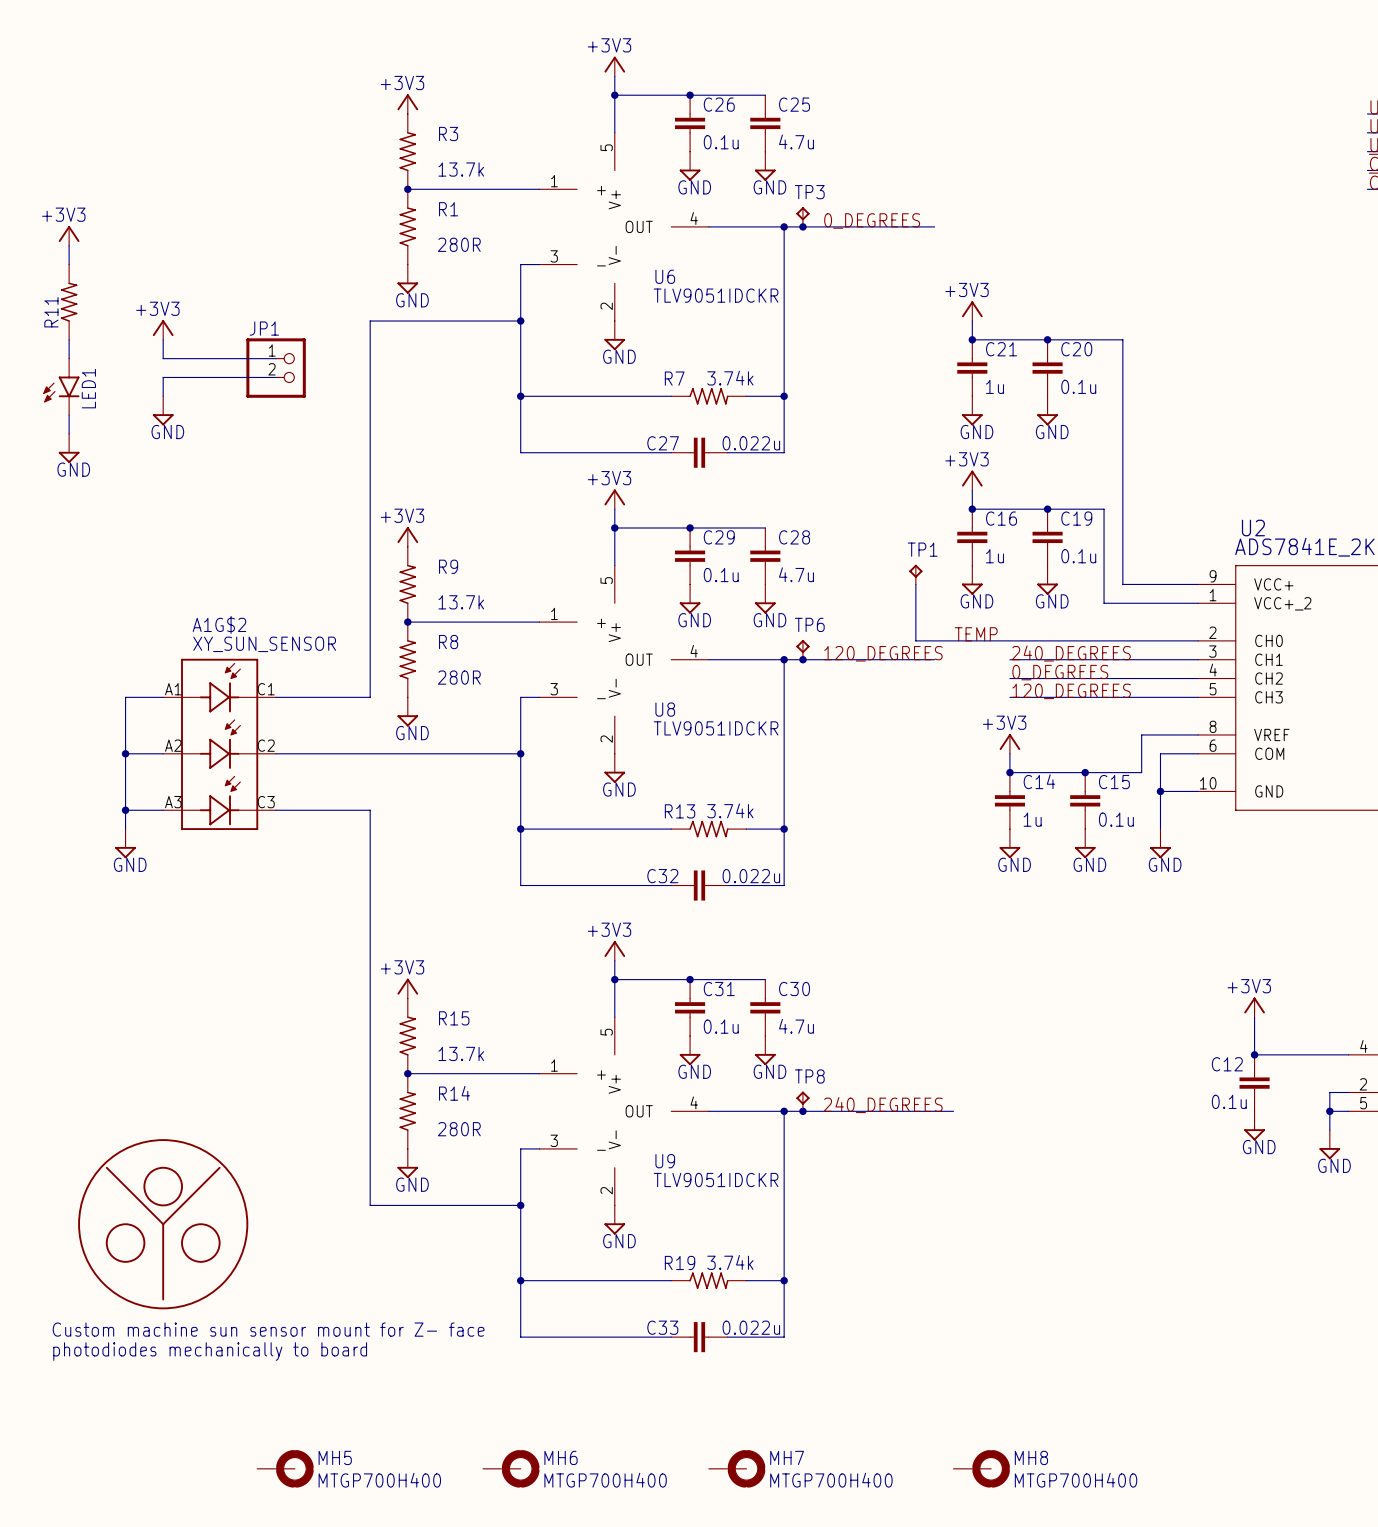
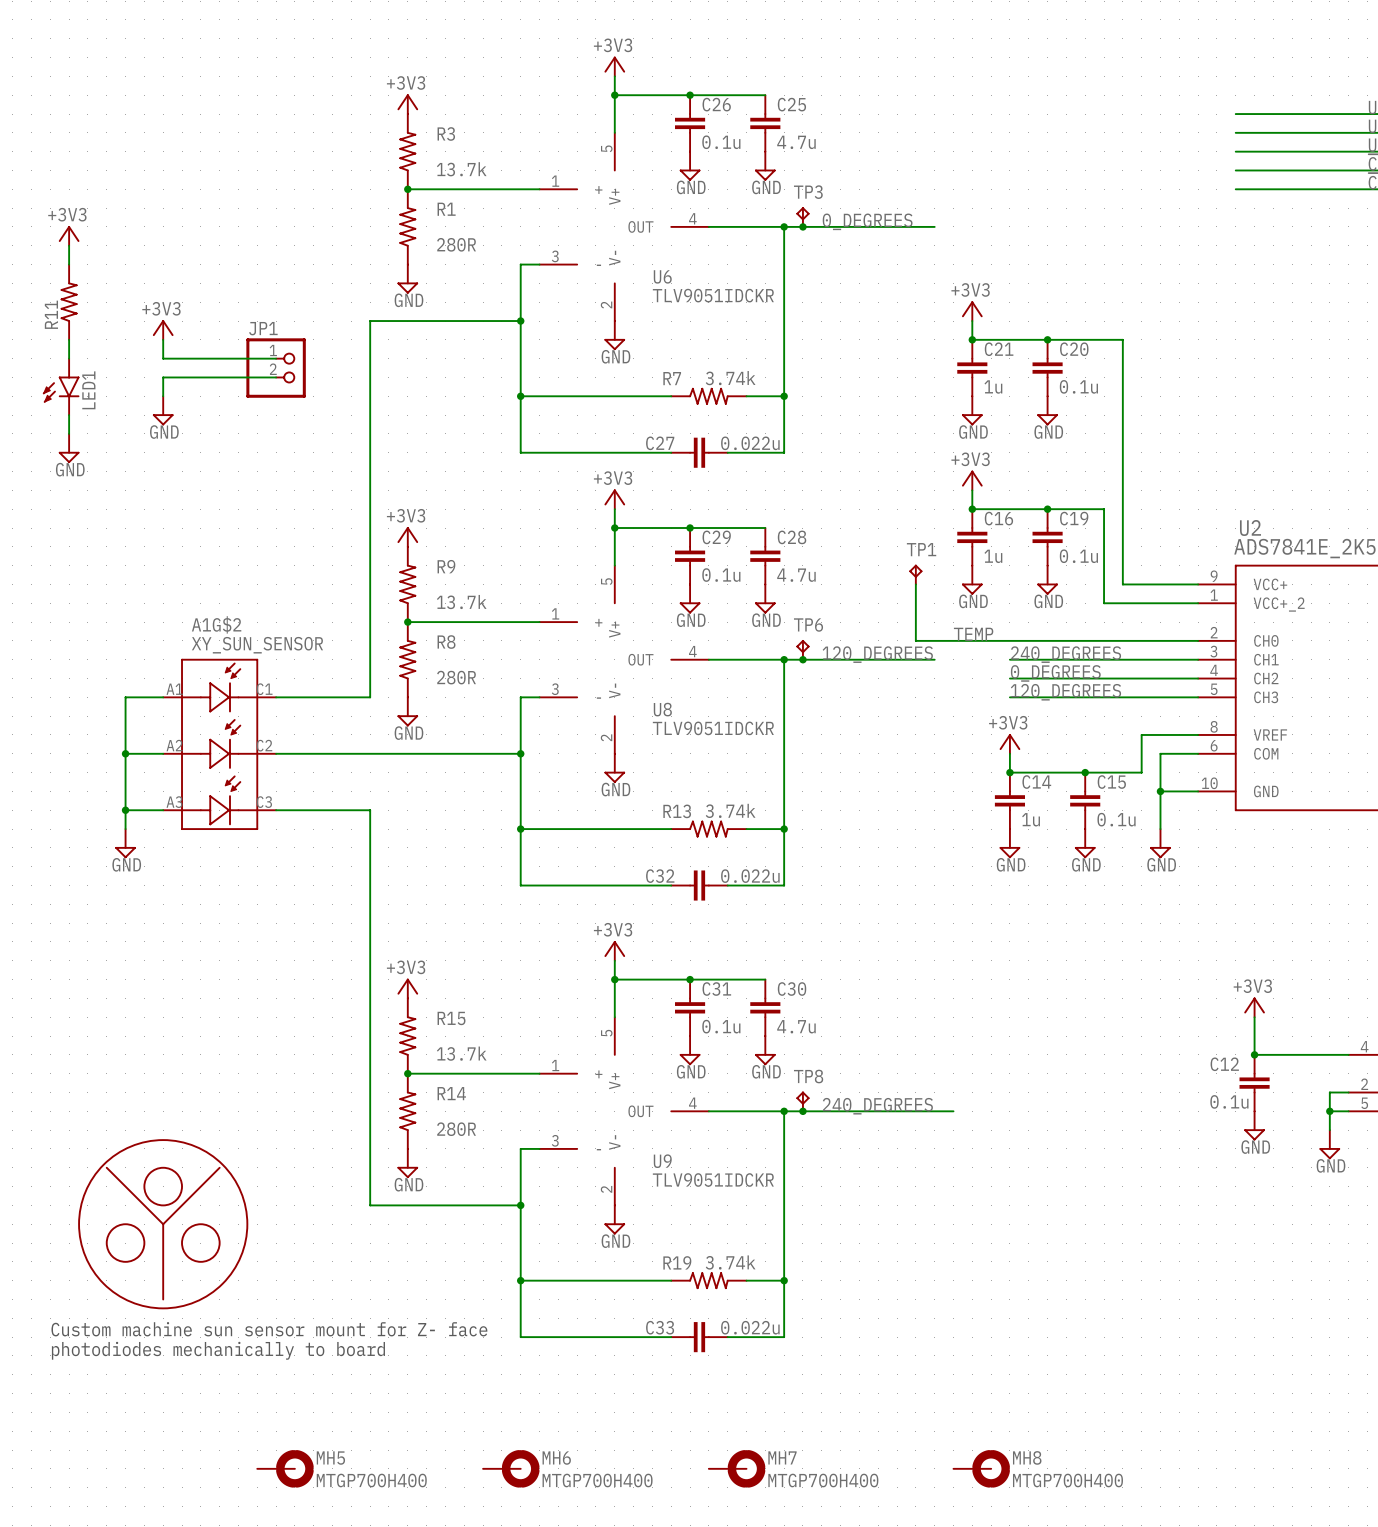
wire: none -> (1235, 114) (1367, 114)
wire: none -> (1235, 132) (1367, 132)
wire: none -> (1235, 151) (1367, 151)
wire: none -> (1235, 170) (1367, 170)
wire: none -> (1235, 189) (1367, 189)

